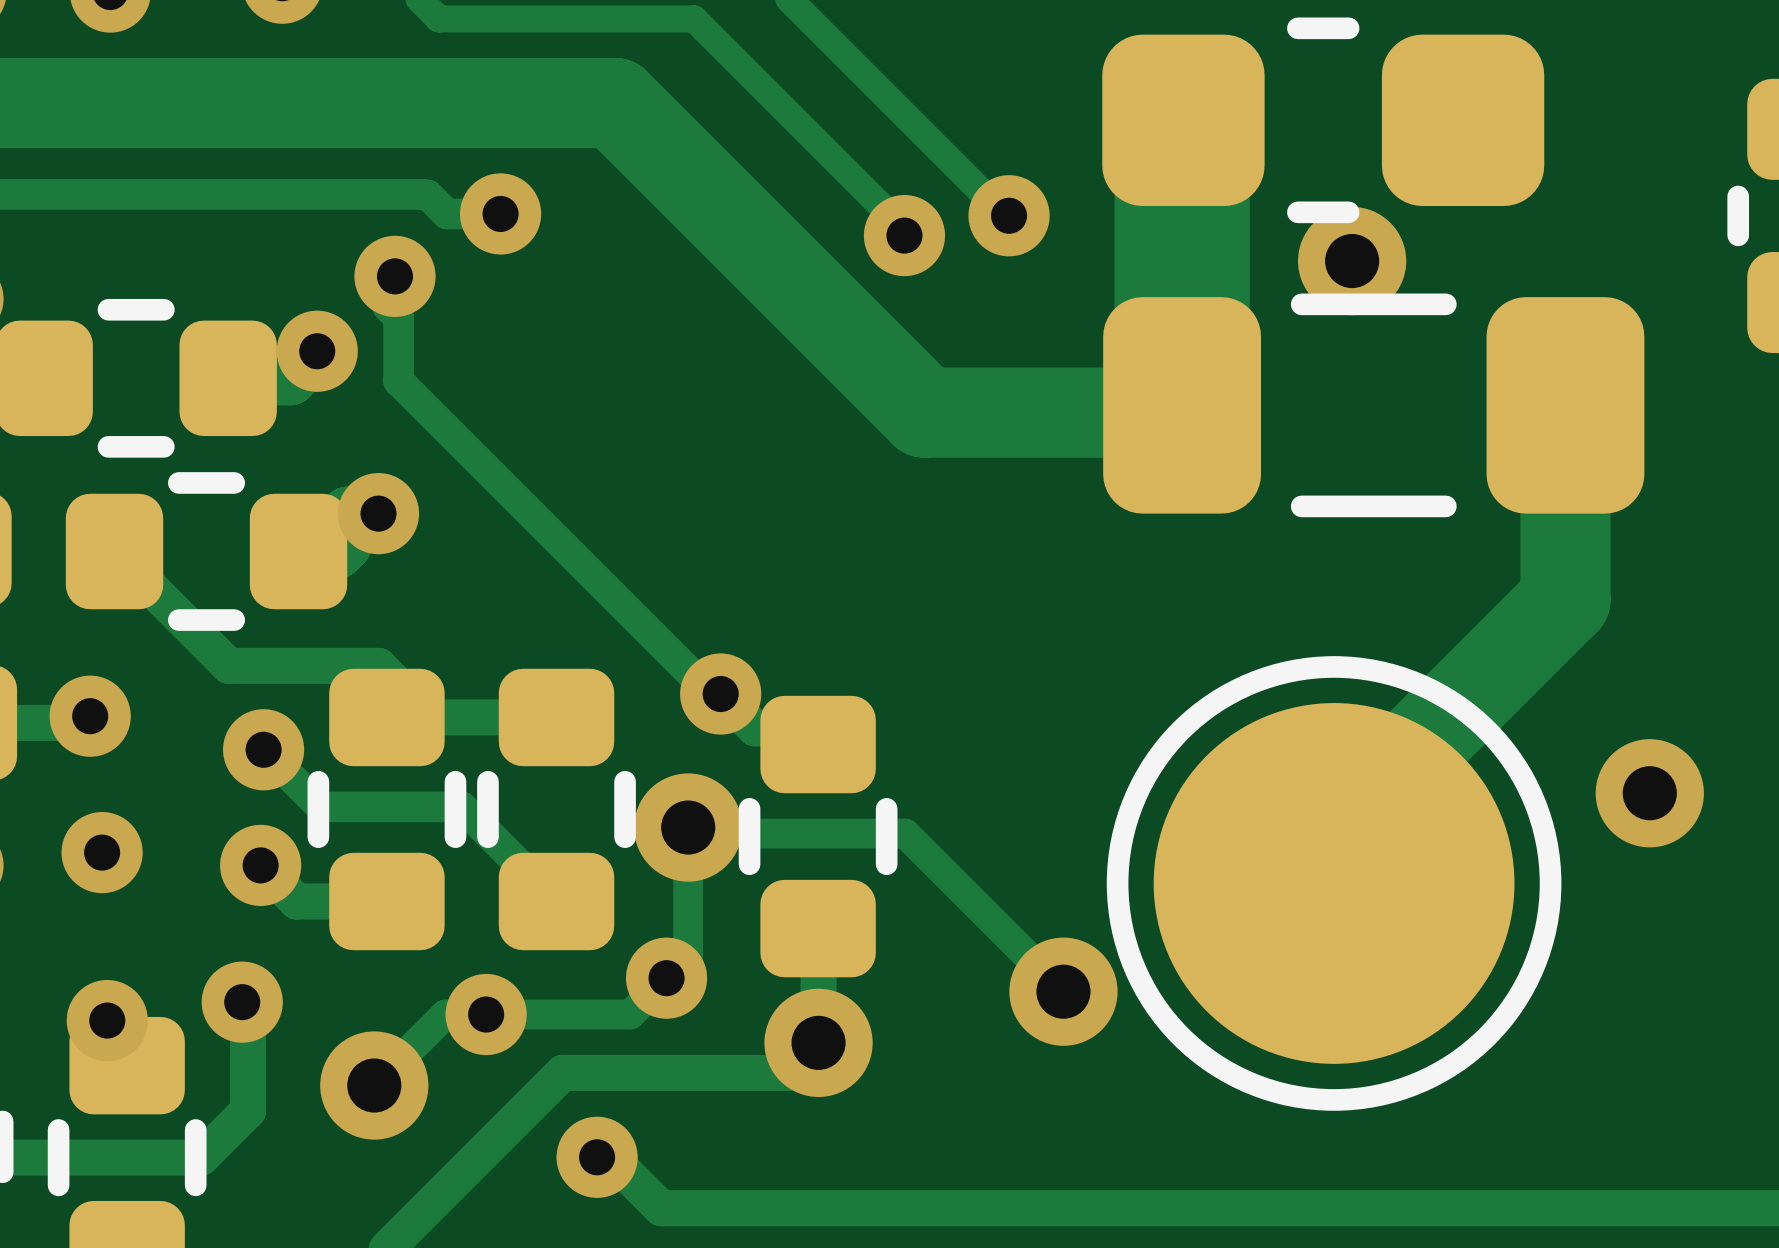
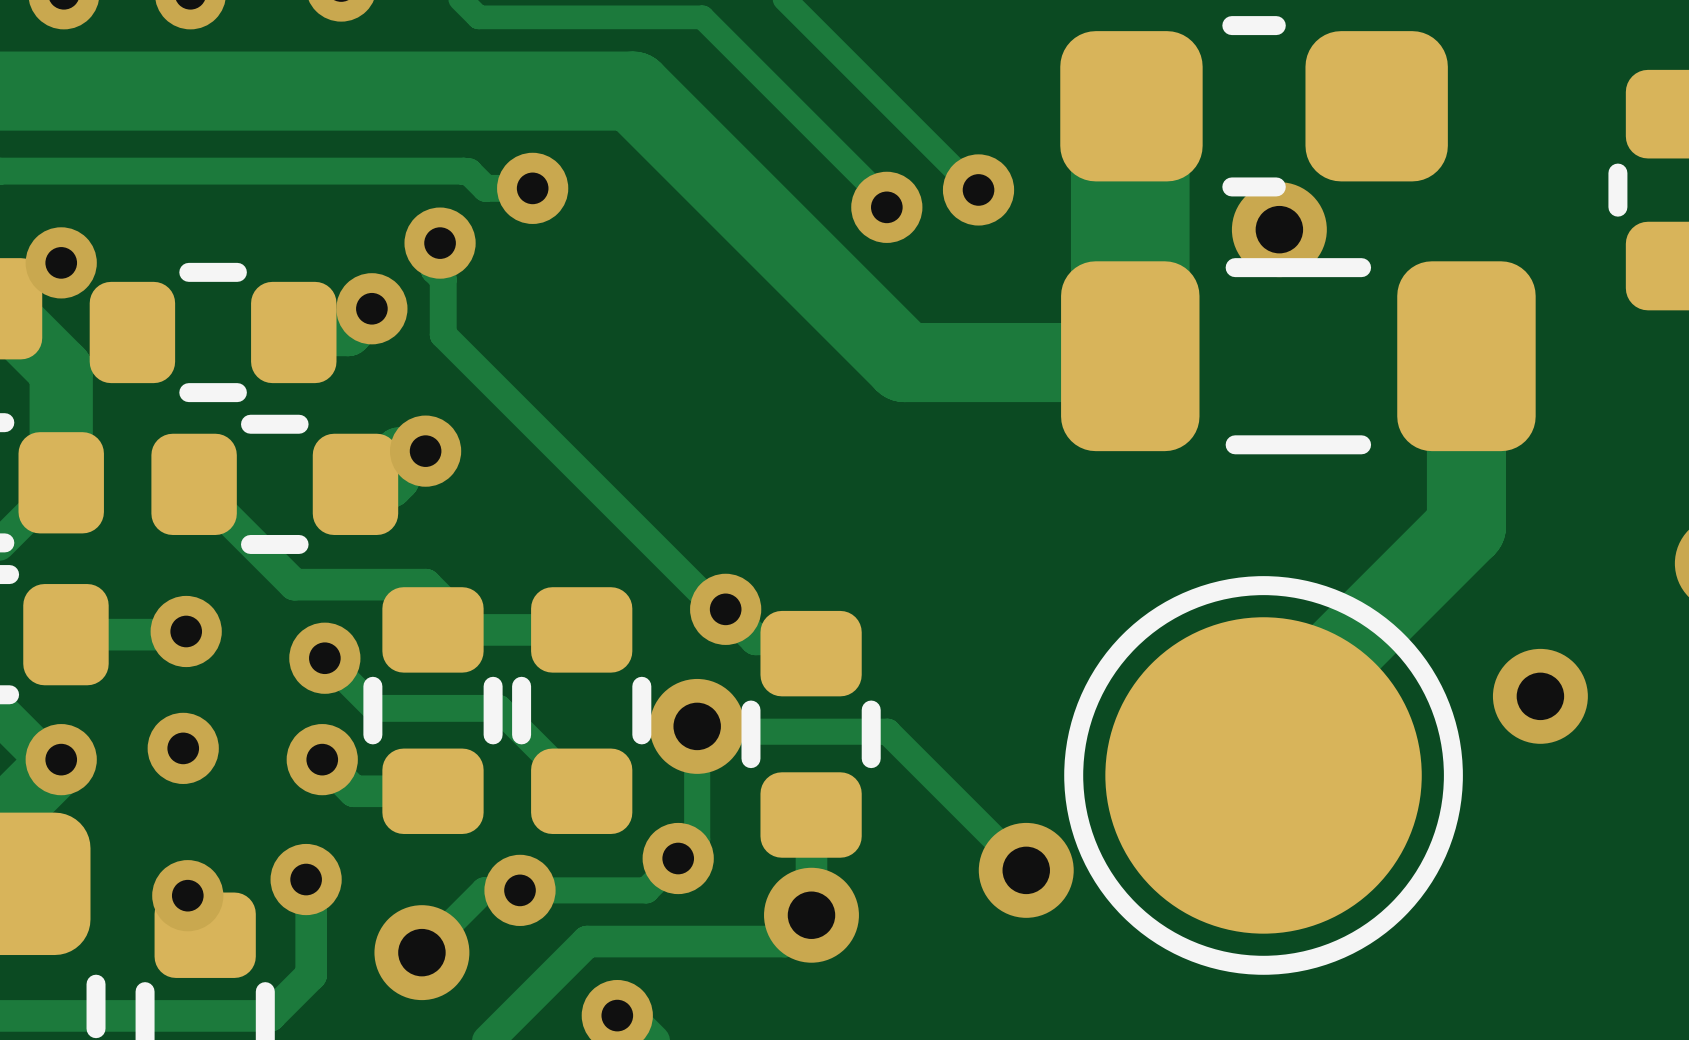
via position: (90, 716) -> (186, 631)

